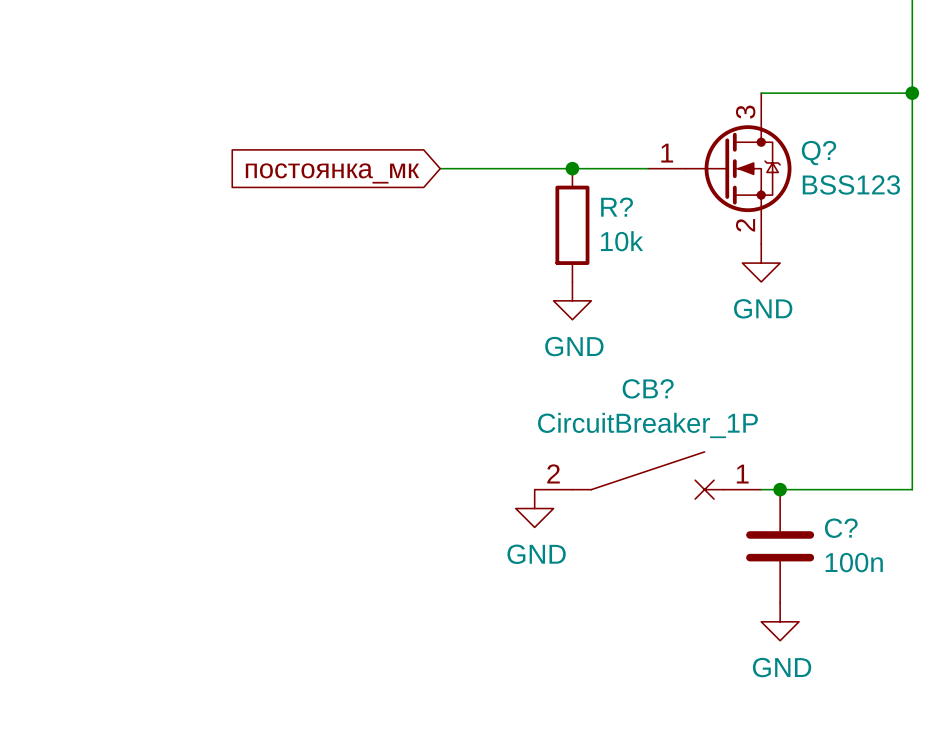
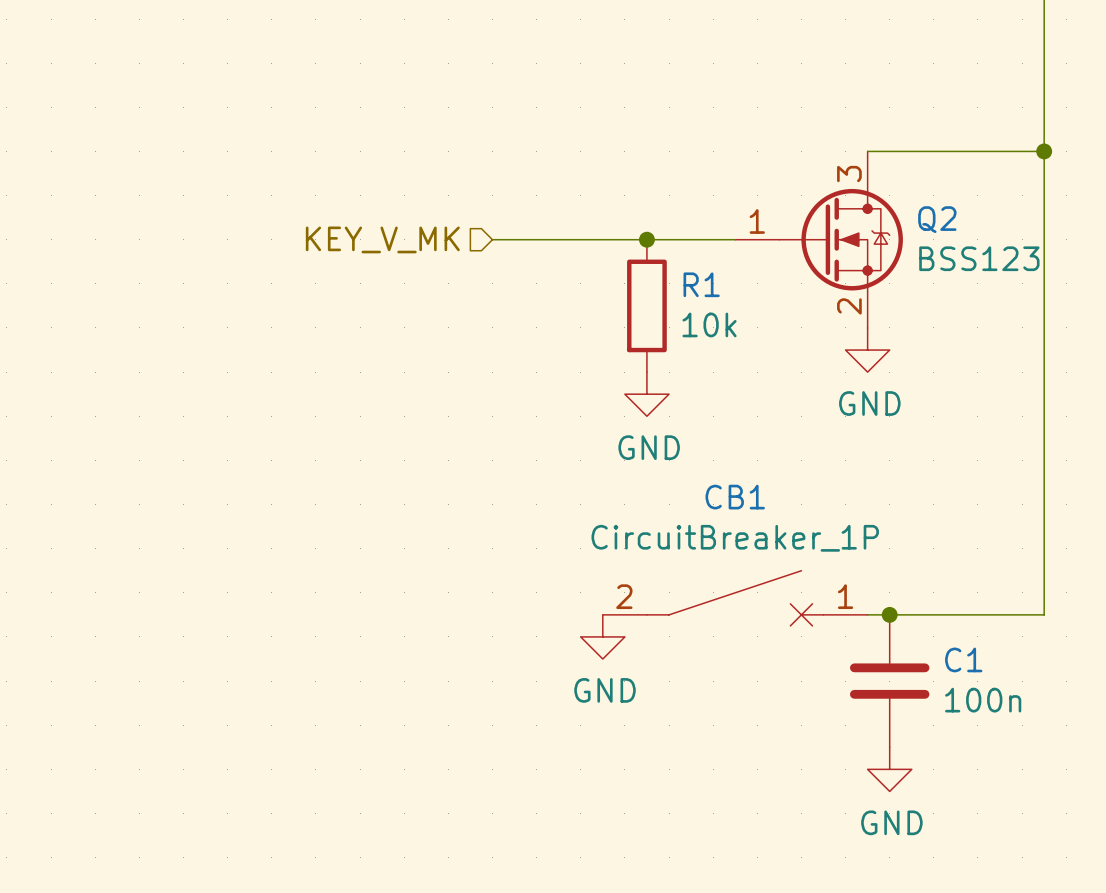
Q? name: Q? (818, 153) -> Q2 (937, 219)
hierarchical label: none -> KEY_V_MK (382, 239)
global label: постоянка_мк (332, 173) -> none
R? name: R? (617, 207) -> R1 (701, 284)
CB? name: CB? (648, 388) -> CB1 (735, 497)
C? name: C? (841, 528) -> C1 (963, 659)

